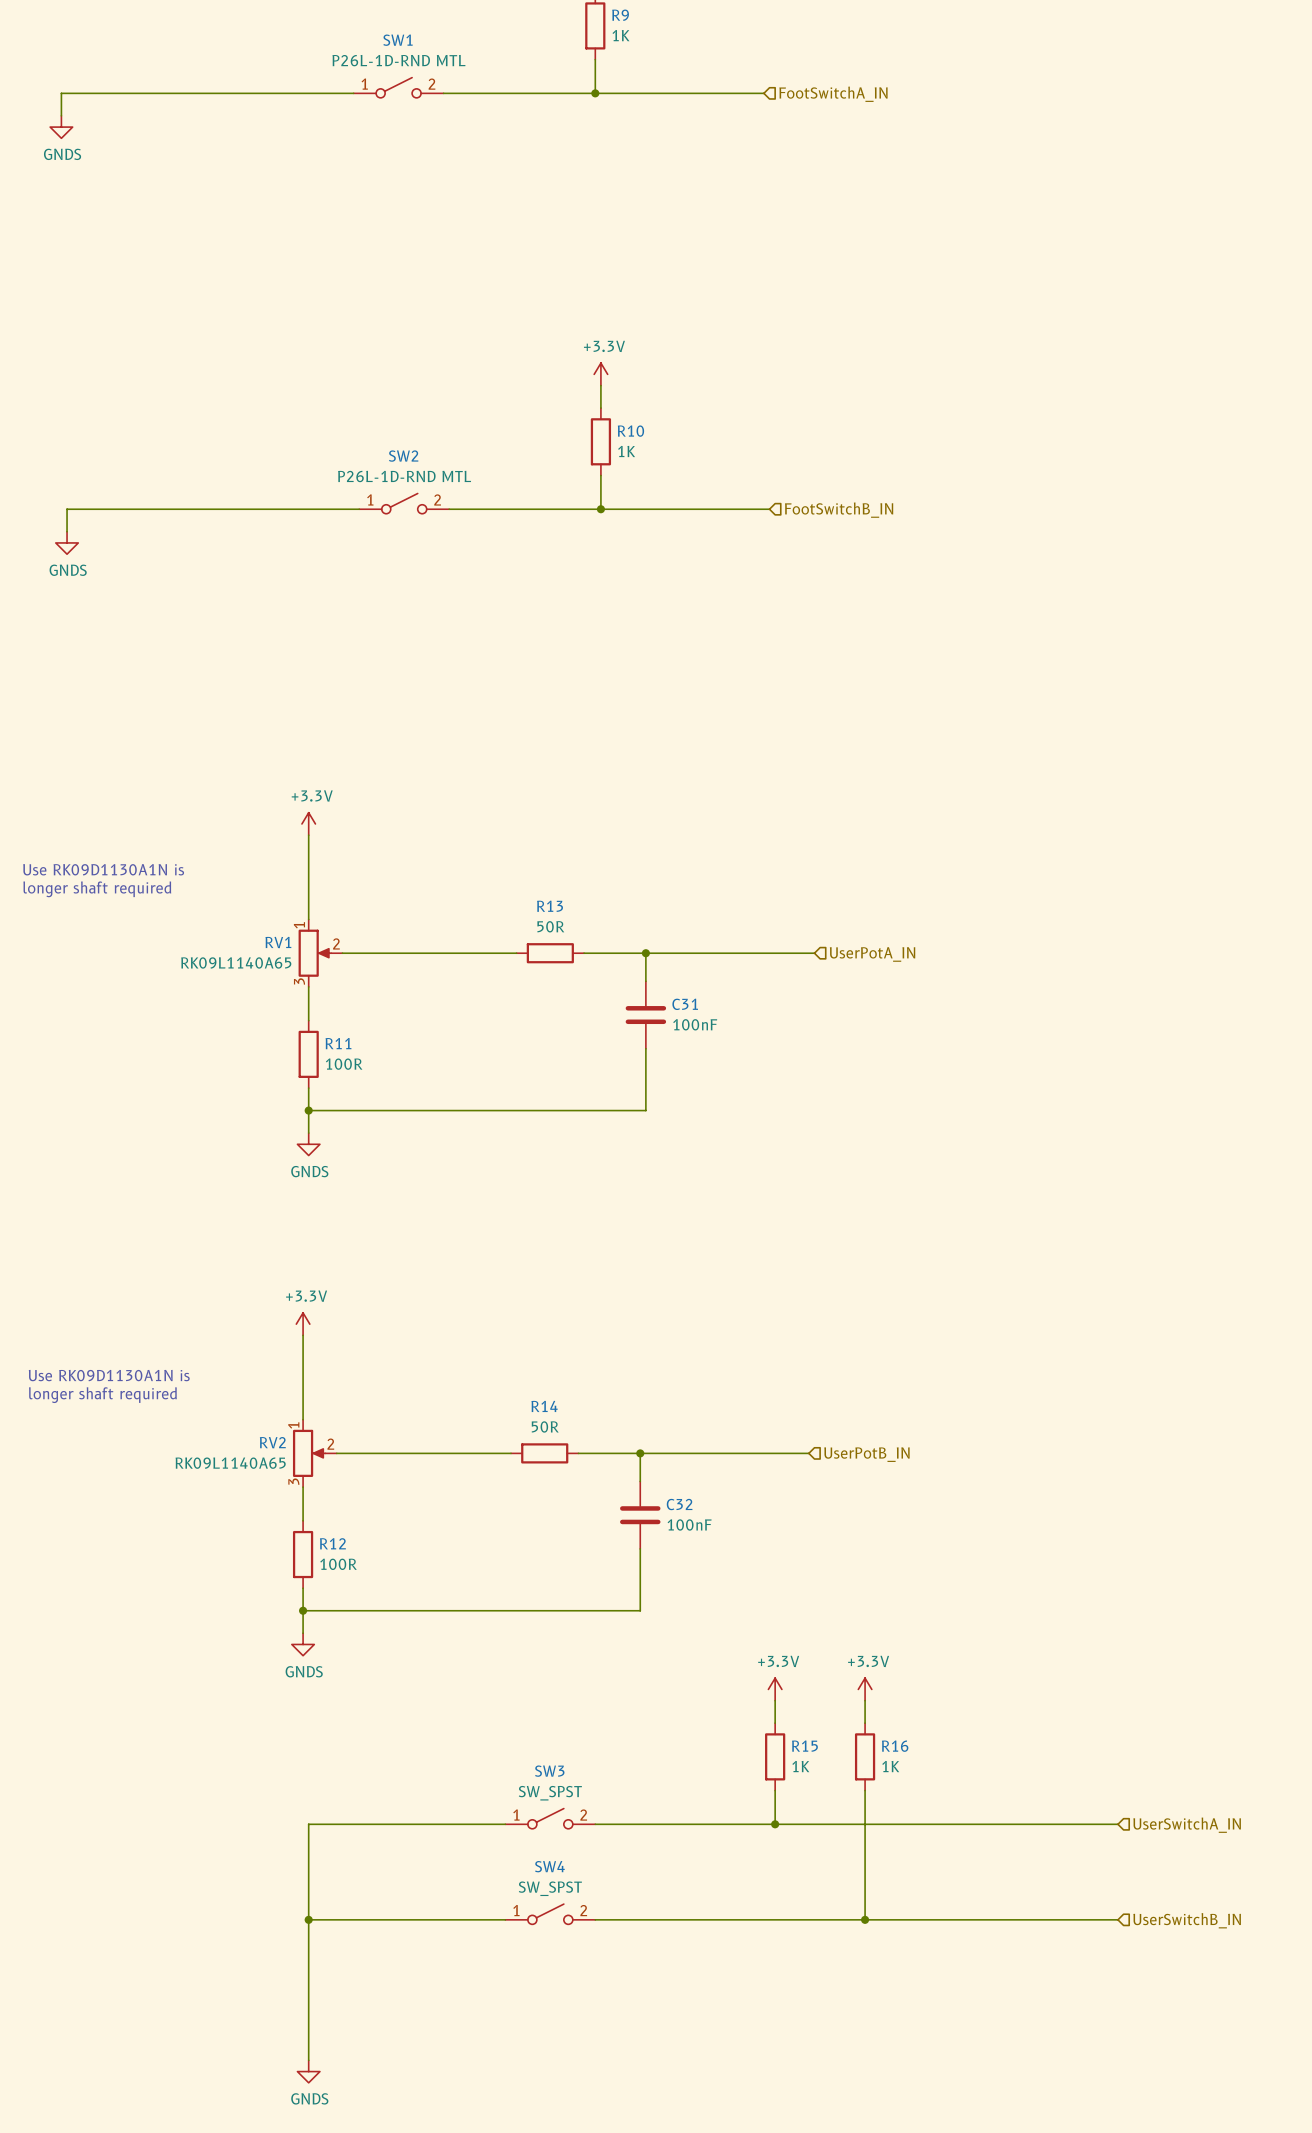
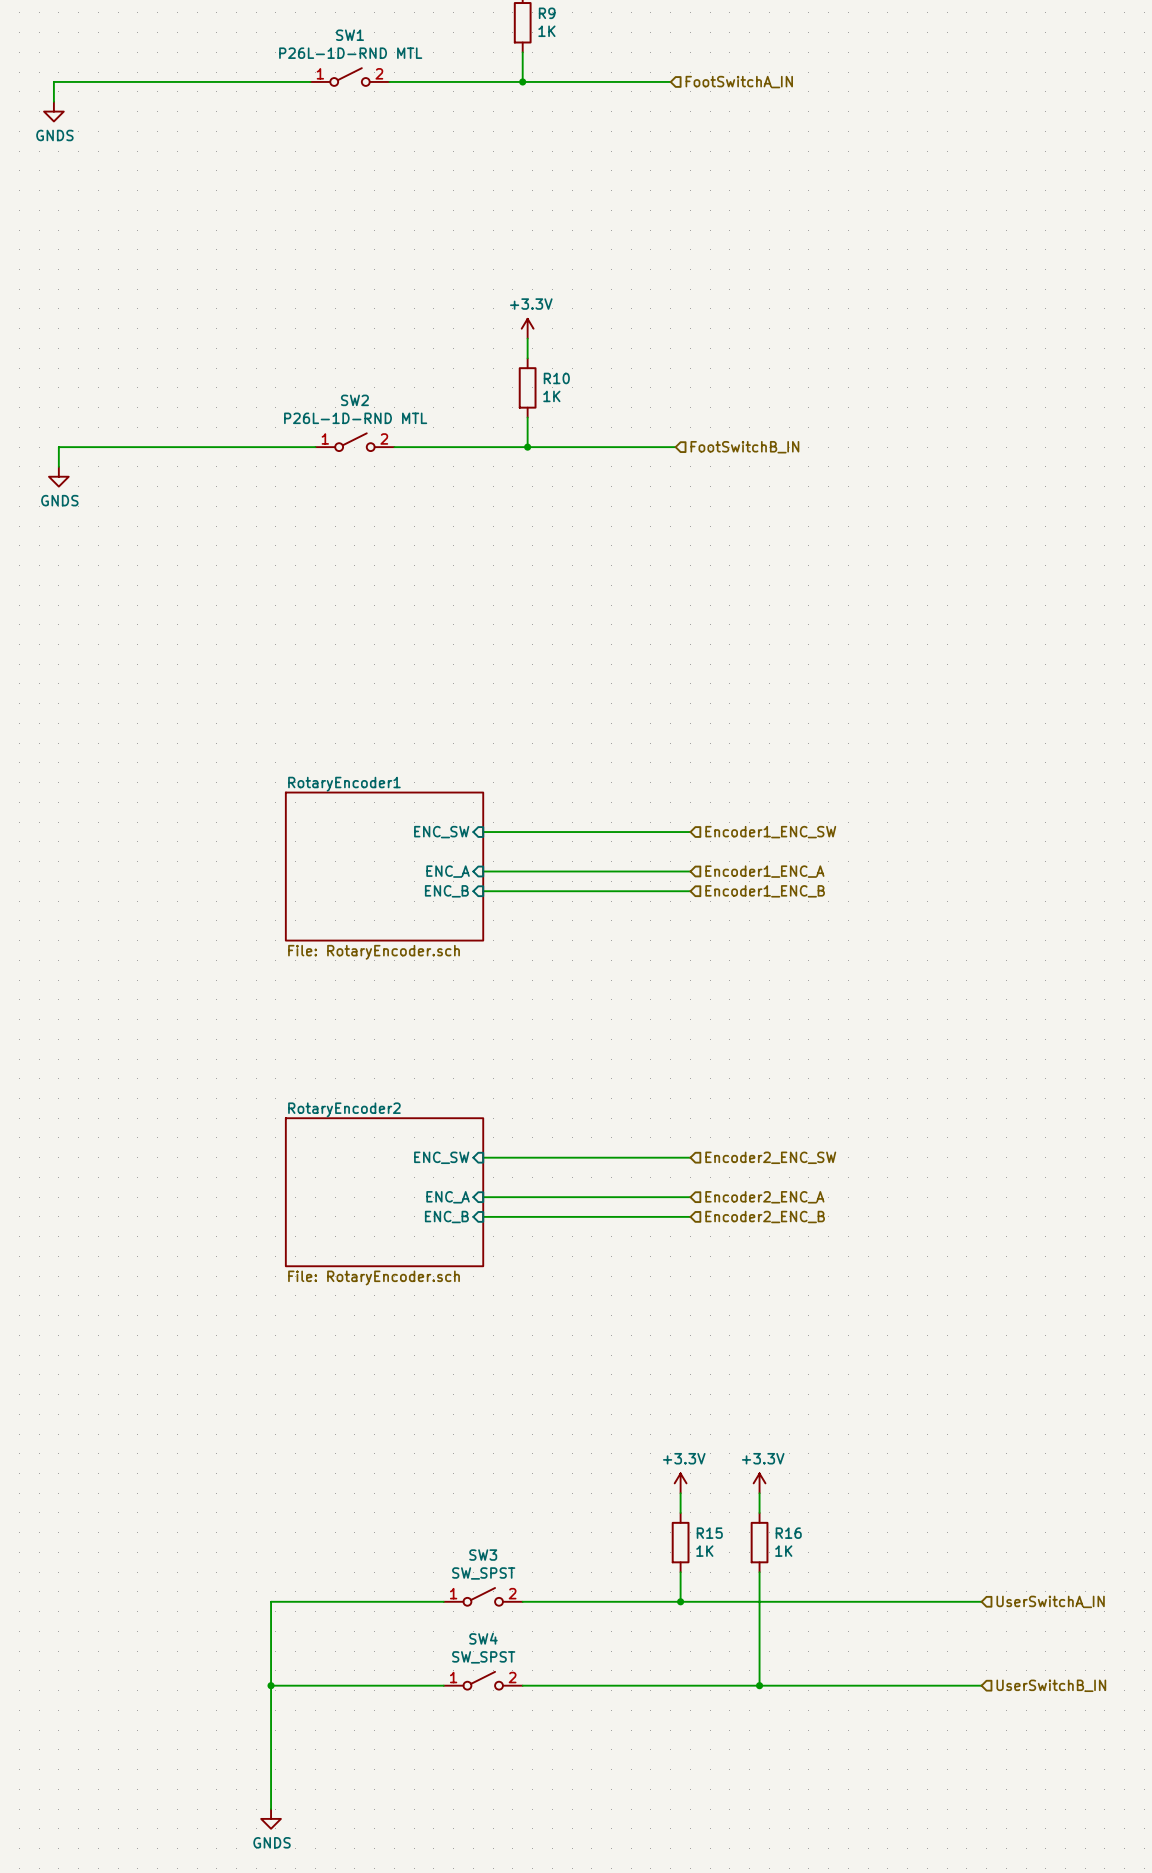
power symbol: +3.3V (308, 823) -> none
wire: (308, 835) (308, 919) -> none
text: Use RK09D1130A1N is (103, 869) -> none
text: longer shaft required (97, 889) -> none
wire: none -> (483, 832) (690, 832)
sheet pin: none -> ENC_SW (441, 832)
hierarchical label: none -> Encoder1_ENC_SW (770, 832)
RV1: RK09L1140A65 (320, 953) -> none
wire: (342, 953) (516, 953) -> none
R13: 50R (550, 953) -> none
wire: (584, 953) (814, 953) -> none
wire: (645, 953) (645, 981) -> none
junction: (645, 953) -> none
hierarchical label: UserPotA_IN (872, 954) -> none
wire: (308, 986) (308, 1020) -> none
sheet RotaryEncoder1: none -> File: RotaryEncoder.sch (384, 866)
wire: none -> (483, 871) (690, 871)
sheet pin: none -> ENC_A (448, 871)
hierarchical label: none -> Encoder1_ENC_A (764, 871)
wire: none -> (483, 891) (690, 891)
C31: 100nF (645, 1015) -> none
hierarchical label: none -> Encoder1_ENC_B (765, 891)
sheet pin: none -> ENC_B (446, 891)
wire: (645, 1048) (645, 1110) (308, 1110) -> none
R11: 100R (308, 1054) -> none
wire: (308, 1088) (308, 1133) -> none
junction: (308, 1110) -> none
power symbol: GNDS (308, 1144) -> none
wire: none -> (483, 1157) (690, 1157)
sheet pin: none -> ENC_SW (441, 1157)
hierarchical label: none -> Encoder2_ENC_SW (770, 1157)
power symbol: +3.3V (303, 1324) -> none
wire: (303, 1335) (303, 1419) -> none
sheet RotaryEncoder2: none -> File: RotaryEncoder.sch (384, 1192)
wire: none -> (483, 1197) (690, 1197)
sheet pin: none -> ENC_A (448, 1197)
hierarchical label: none -> Encoder2_ENC_A (764, 1197)
text: Use RK09D1130A1N is (109, 1375) -> none
wire: none -> (483, 1216) (690, 1216)
hierarchical label: none -> Encoder2_ENC_B (765, 1217)
sheet pin: none -> ENC_B (446, 1217)
text: longer shaft required (102, 1395) -> none
RV2: RK09L1140A65 (314, 1453) -> none
wire: (336, 1453) (511, 1453) -> none
R14: 50R (544, 1453) -> none
wire: (578, 1453) (808, 1453) -> none
wire: (640, 1453) (640, 1481) -> none
junction: (640, 1453) -> none
hierarchical label: UserPotB_IN (866, 1454) -> none
wire: (303, 1487) (303, 1520) -> none
C32: 100nF (640, 1515) -> none
wire: (640, 1548) (640, 1610) (303, 1610) -> none
R12: 100R (303, 1554) -> none
wire: (303, 1588) (303, 1633) -> none
junction: (303, 1610) -> none
power symbol: GNDS (303, 1644) -> none

